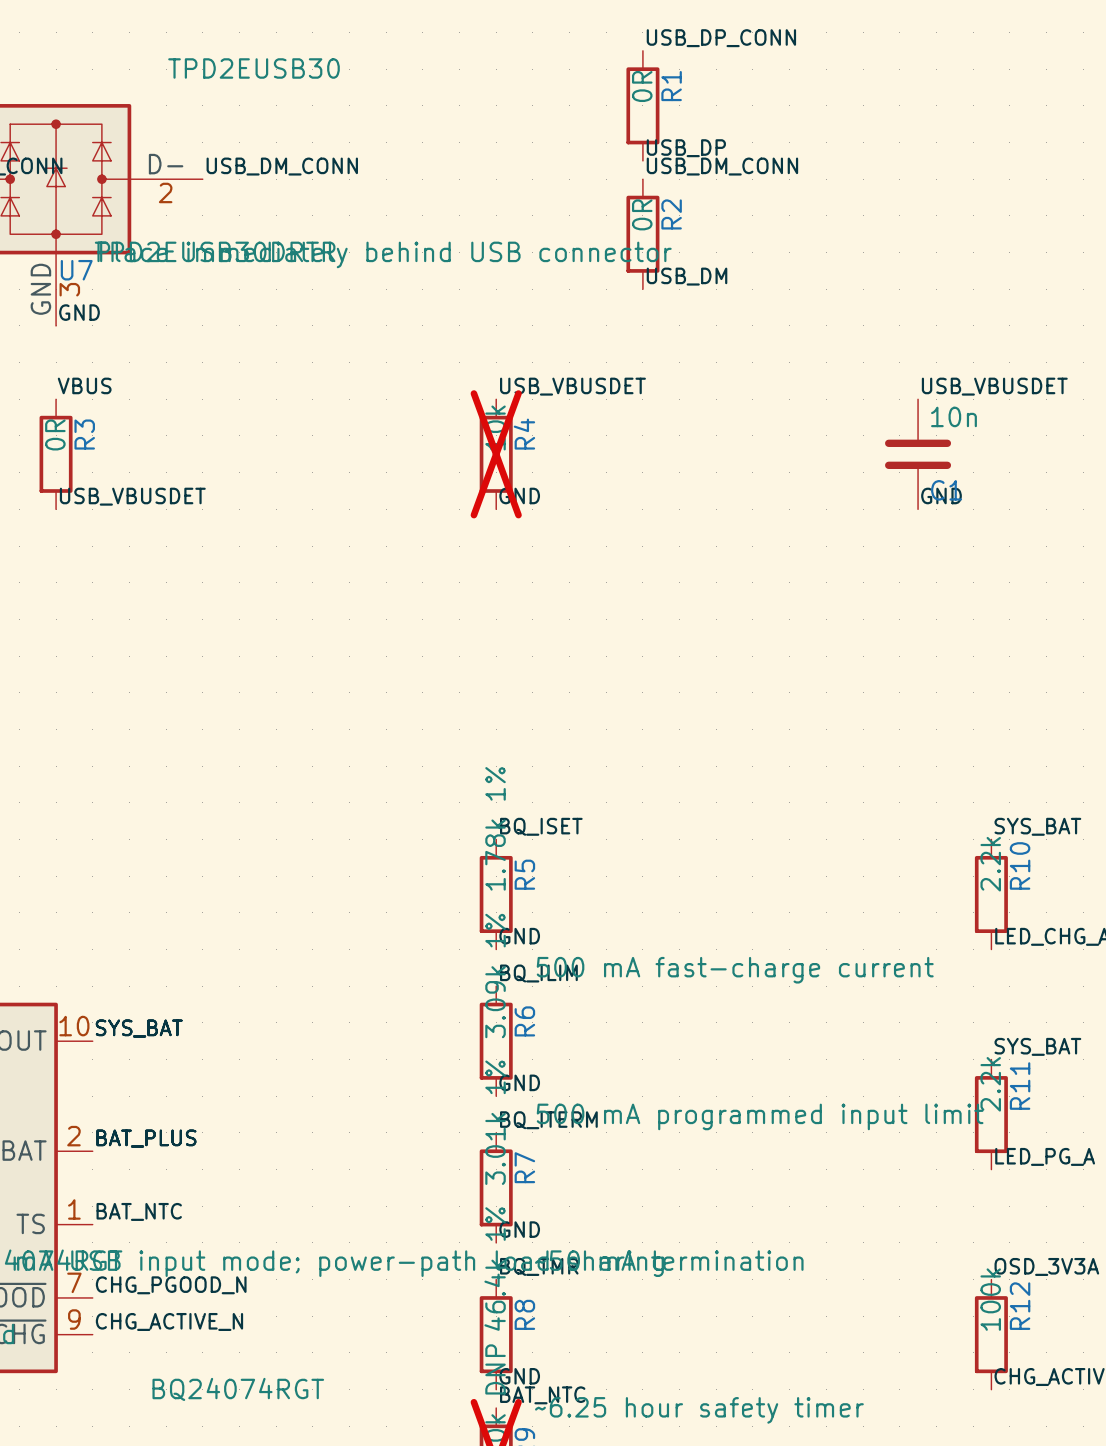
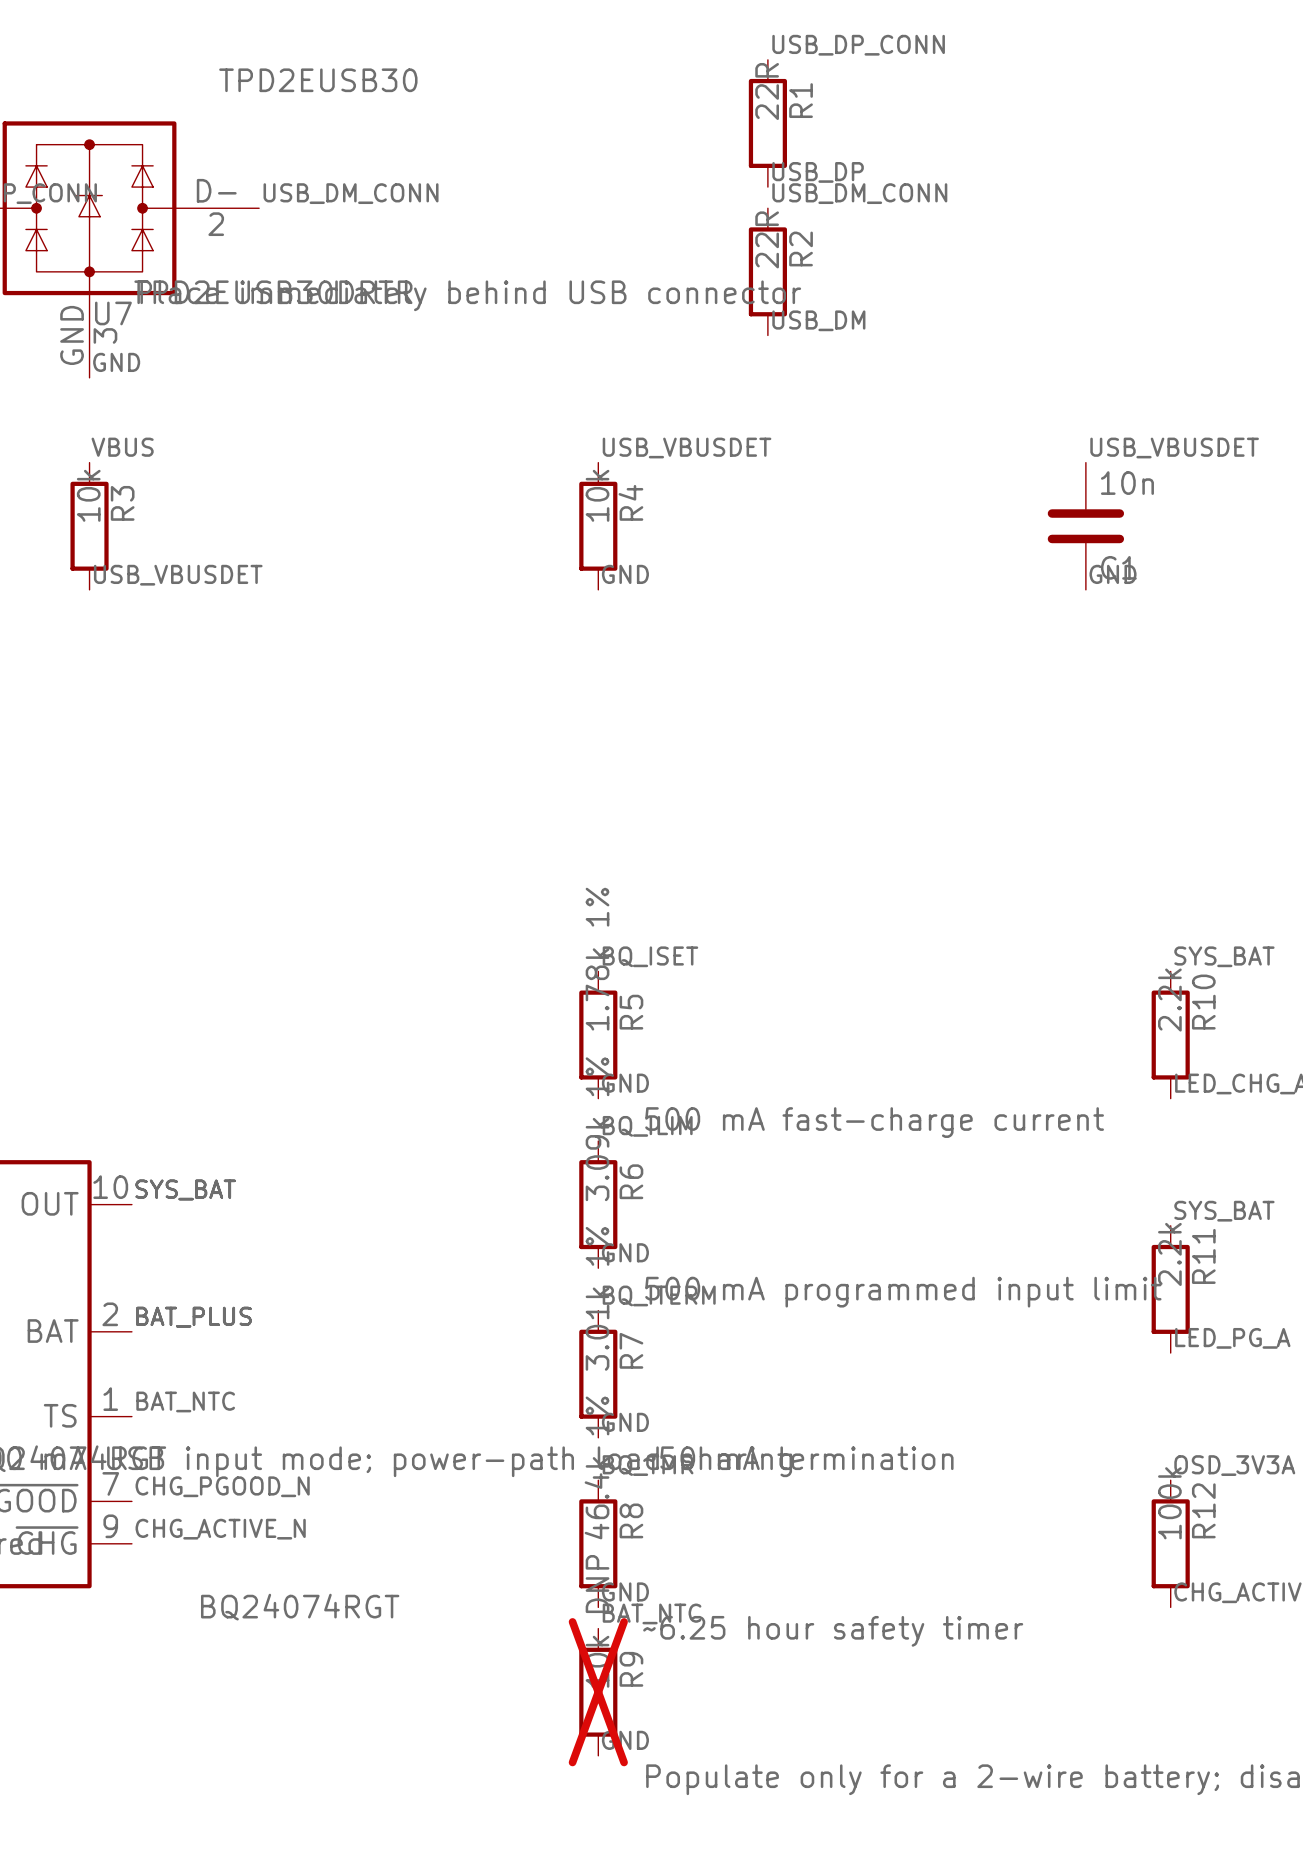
R1 value: 0R (642, 86) -> 22R (767, 91)
R2 value: 0R (642, 214) -> 22R (767, 239)
R3 value: 0R (55, 434) -> 10k (88, 495)
R4 do-not-place cross: (496, 454) -> none

